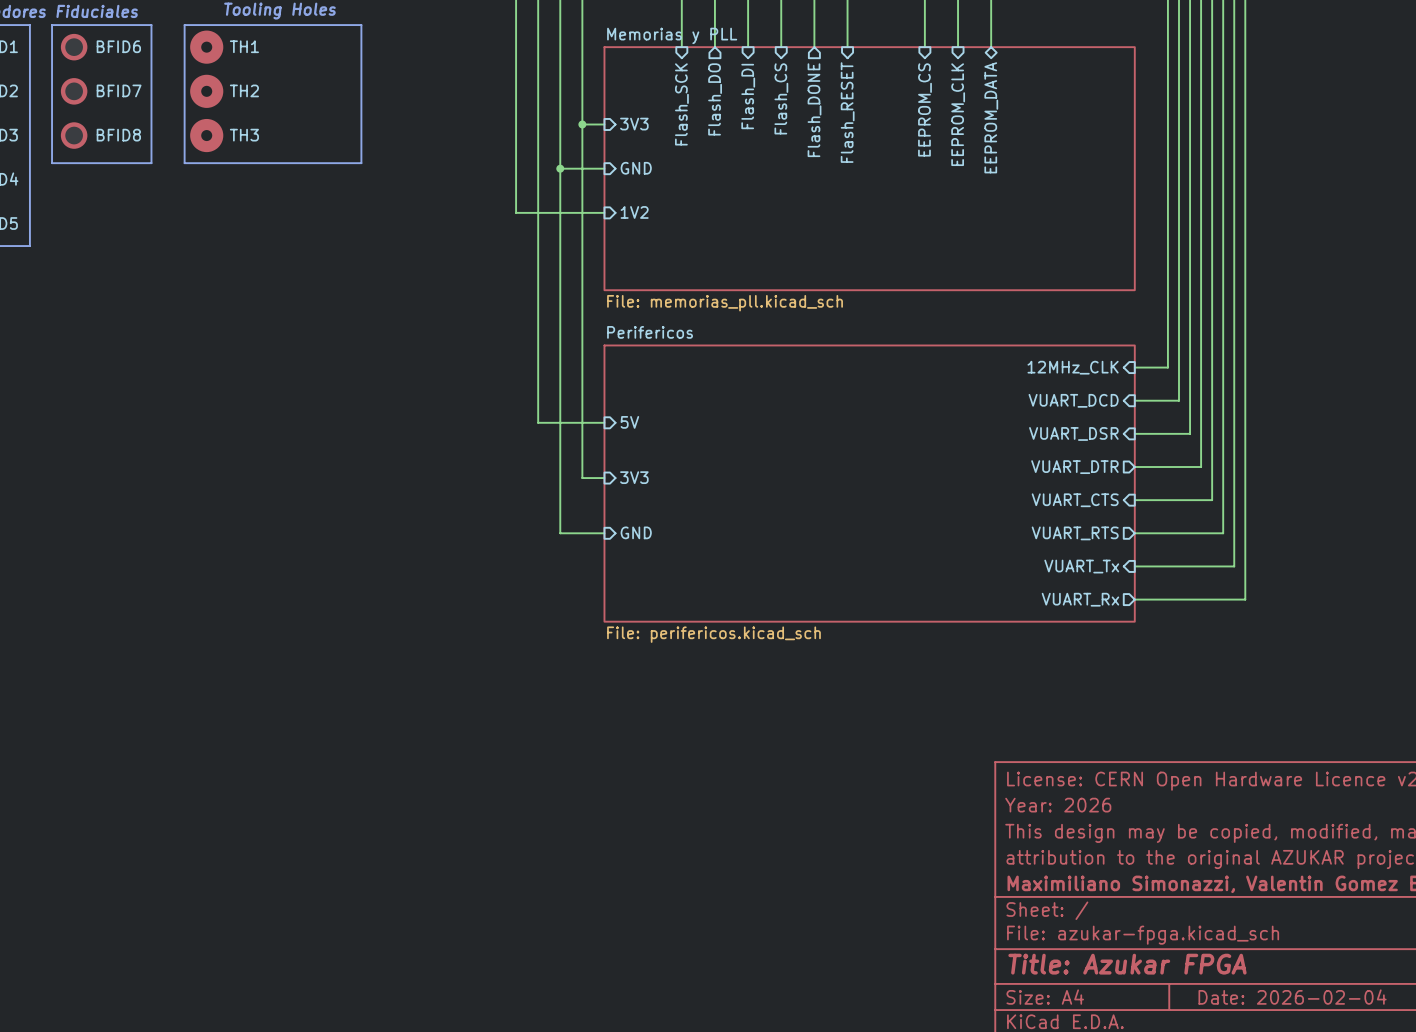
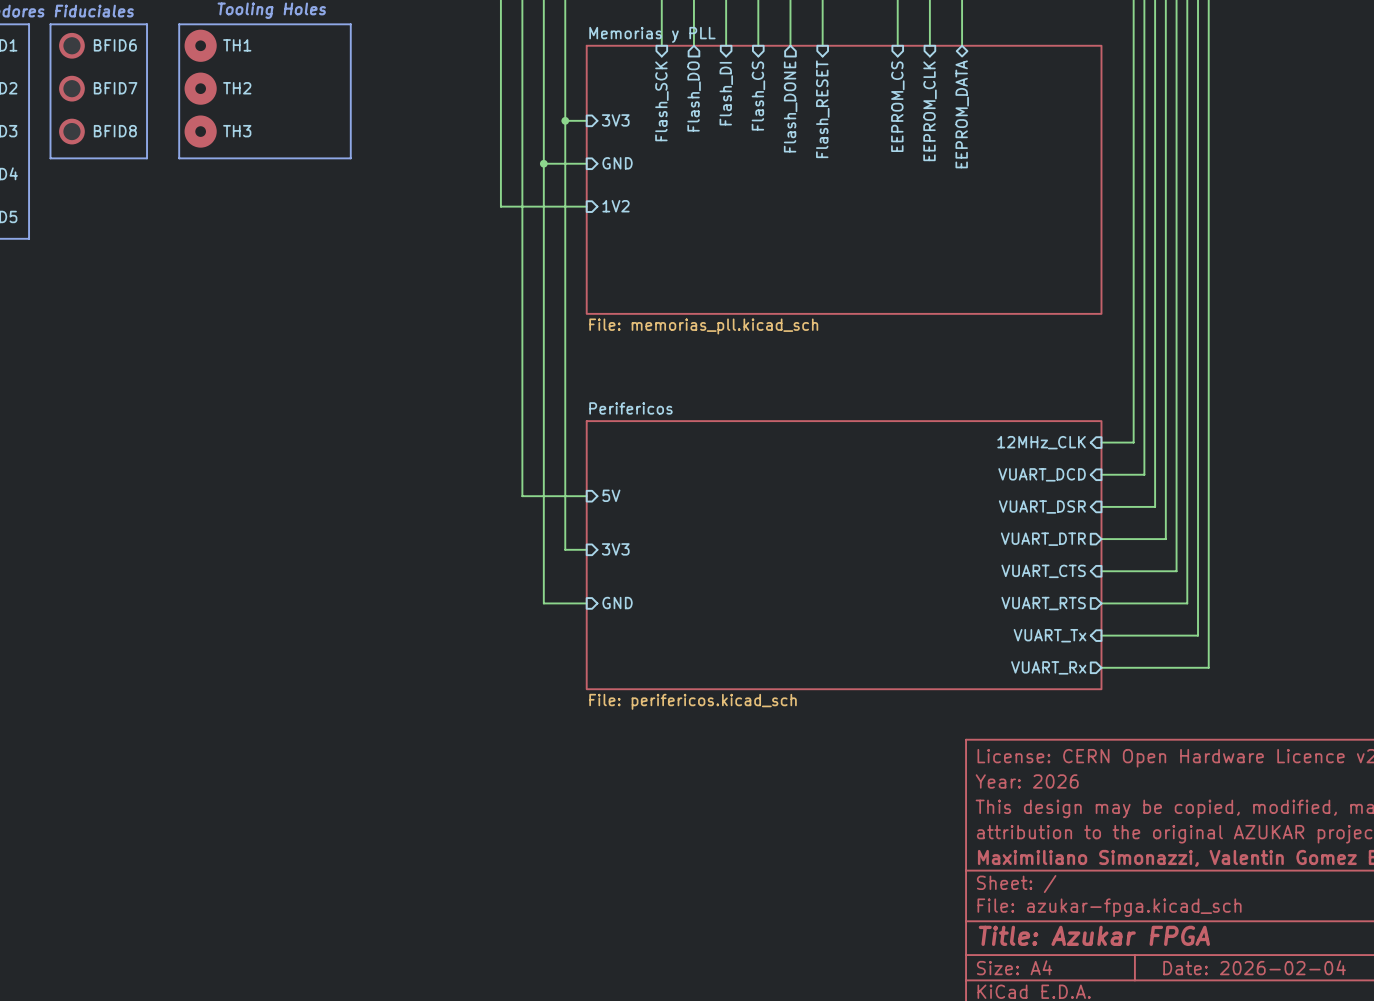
sheet Memorias y PLL: File: memorias_pll.kicad_sch (869, 168) -> none
sheet Memorias y PLL: none -> File: memorias_pll.kicad_sch (844, 179)
sheet pin position: 12MHz_CLK (1073, 367) -> 12MHz_CLK (1041, 442)
wire: (1134, 367) (1167, 367) -> (1101, 442) (1133, 442) (1133, 356)
sheet pin position: VUART_DCD (1073, 400) -> VUART_DCD (1042, 474)
wire: (1134, 400) (1179, 400) -> (1101, 474) (1144, 474) (1144, 388)
wire: (538, 422) (604, 422) -> (522, 410) (522, 496) (586, 496)
sheet pin position: 5V (629, 422) -> 5V (611, 495)
sheet pin position: VUART_DSR (1073, 433) -> VUART_DSR (1042, 507)
wire: (1134, 433) (1190, 433) -> (1101, 506) (1155, 506) (1155, 421)
sheet pin position: VUART_DTR (1074, 467) -> VUART_DTR (1043, 539)
wire: (1134, 467) (1201, 467) -> (1101, 539) (1165, 539) (1165, 453)
sheet pin position: 3V3 (634, 477) -> 3V3 (615, 549)
wire: (582, 478) (604, 478) -> (565, 464) (565, 549) (586, 549)
sheet Perifericos position: (869, 483) -> (844, 555)
sheet pin position: VUART_CTS (1075, 500) -> VUART_CTS (1043, 571)
wire: (1134, 500) (1212, 500) -> (1101, 571) (1176, 571) (1176, 485)
sheet pin position: GND (636, 532) -> GND (617, 603)
wire: (560, 533) (604, 533) -> (543, 517) (543, 603) (586, 603)
sheet pin position: VUART_RTS (1075, 533) -> VUART_RTS (1043, 603)
wire: (1134, 533) (1223, 533) -> (1101, 603) (1187, 603) (1187, 517)
sheet pin position: VUART_Tx (1081, 566) -> VUART_Tx (1050, 635)
wire: (1134, 566) (1234, 566) -> (1101, 635) (1198, 635) (1198, 549)
sheet pin position: VUART_Rx (1080, 599) -> VUART_Rx (1048, 667)
wire: (1134, 599) (1245, 599) -> (1101, 667) (1208, 667) (1208, 581)

